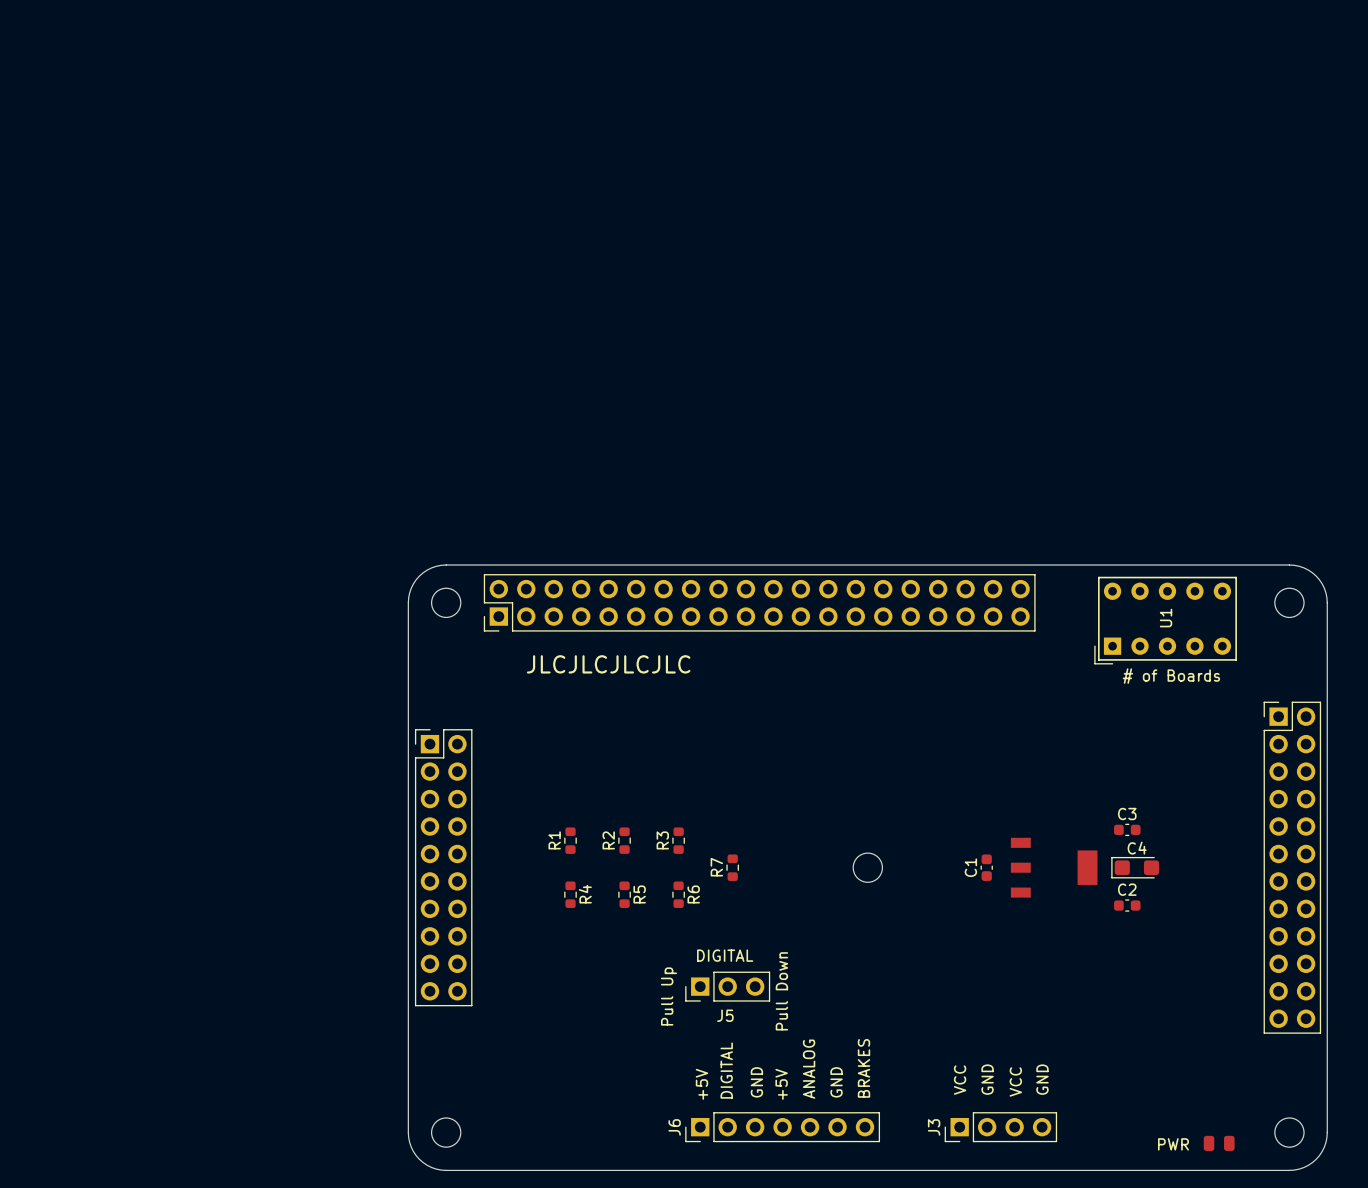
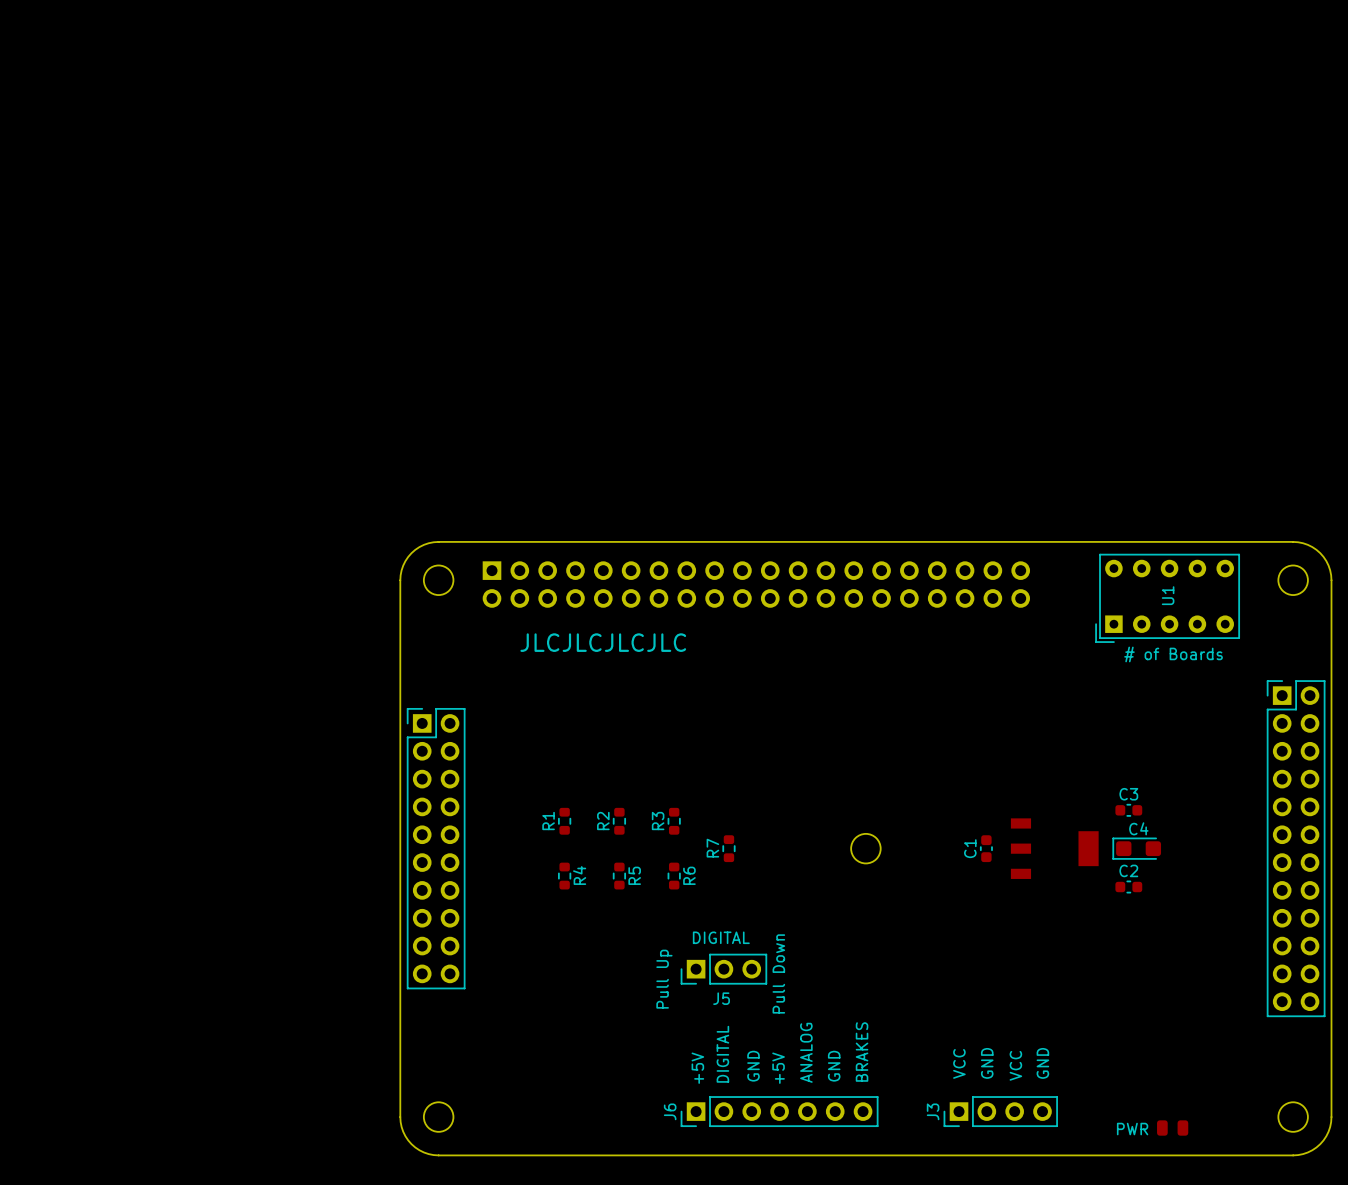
part side: top (759, 602) -> bottom (756, 584)
part position: (1219, 1143) -> (1172, 1128)
text position: PWR (1173, 1144) -> PWR (1132, 1129)

